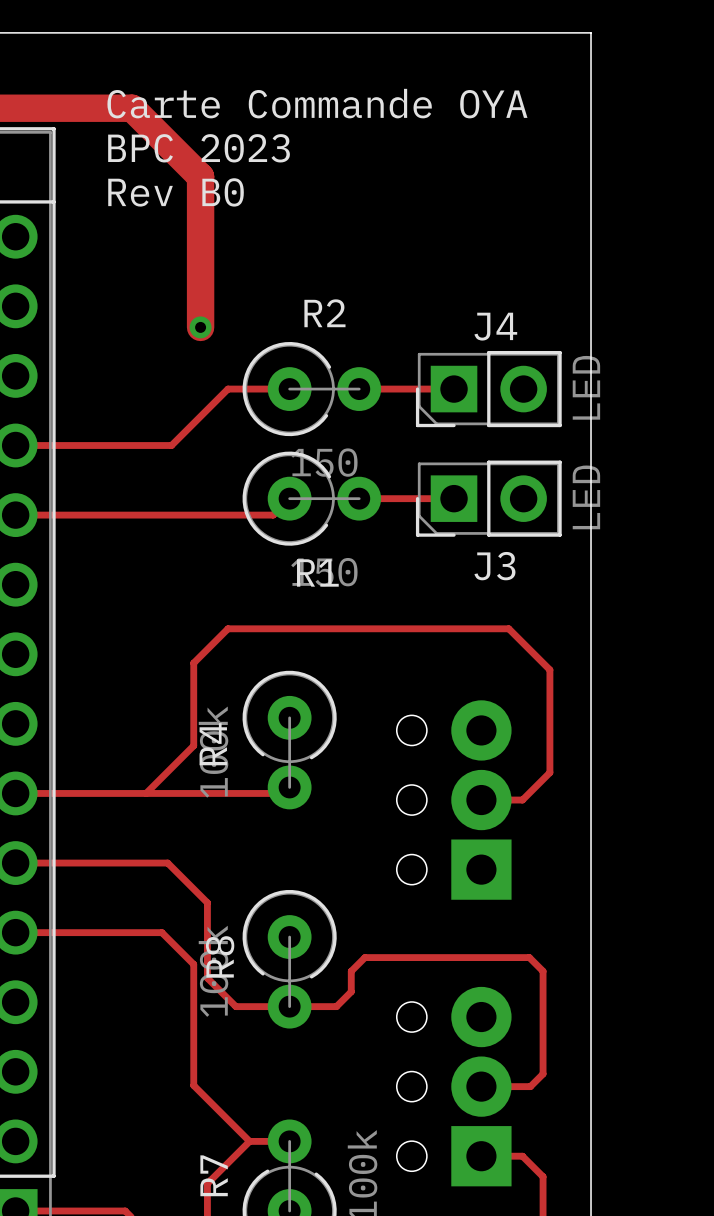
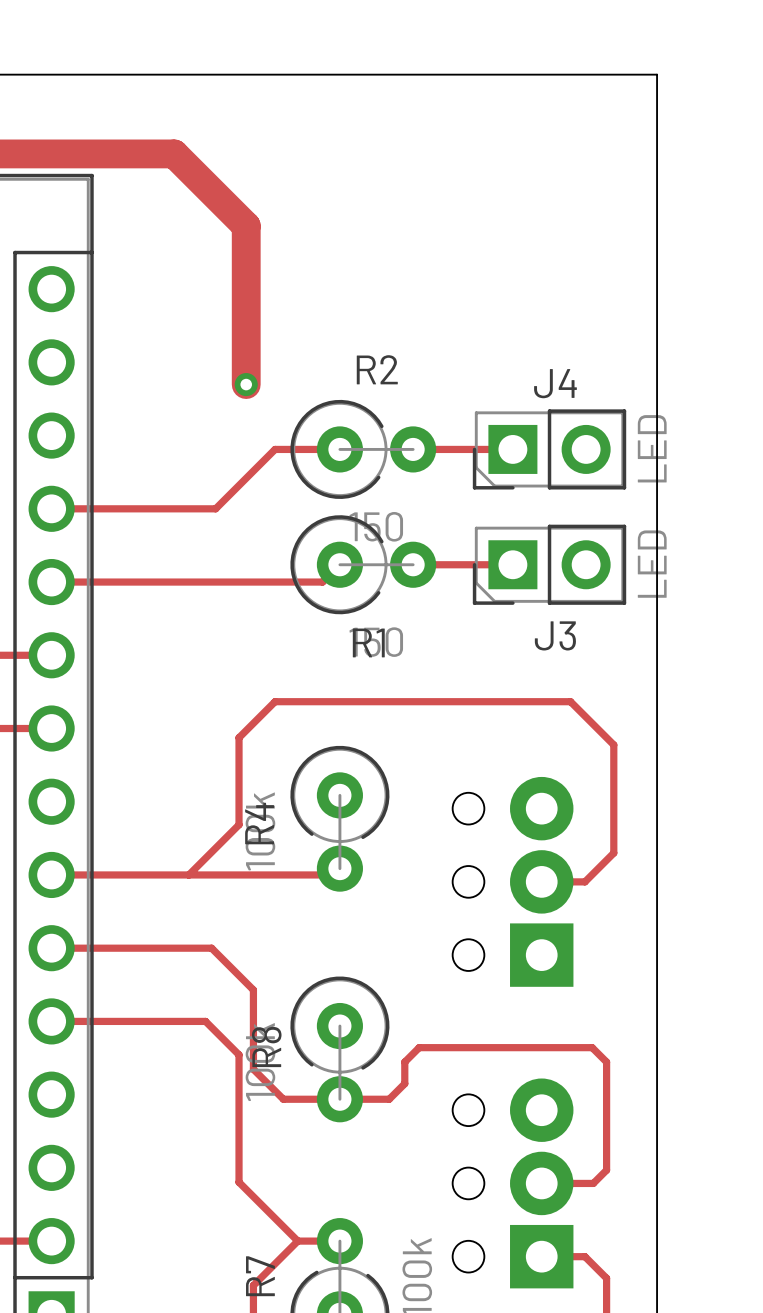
text: Carte Commande OYA (317, 103) -> none
text: BPC 2023 (199, 148) -> none
text: Rev B0 (176, 192) -> none

